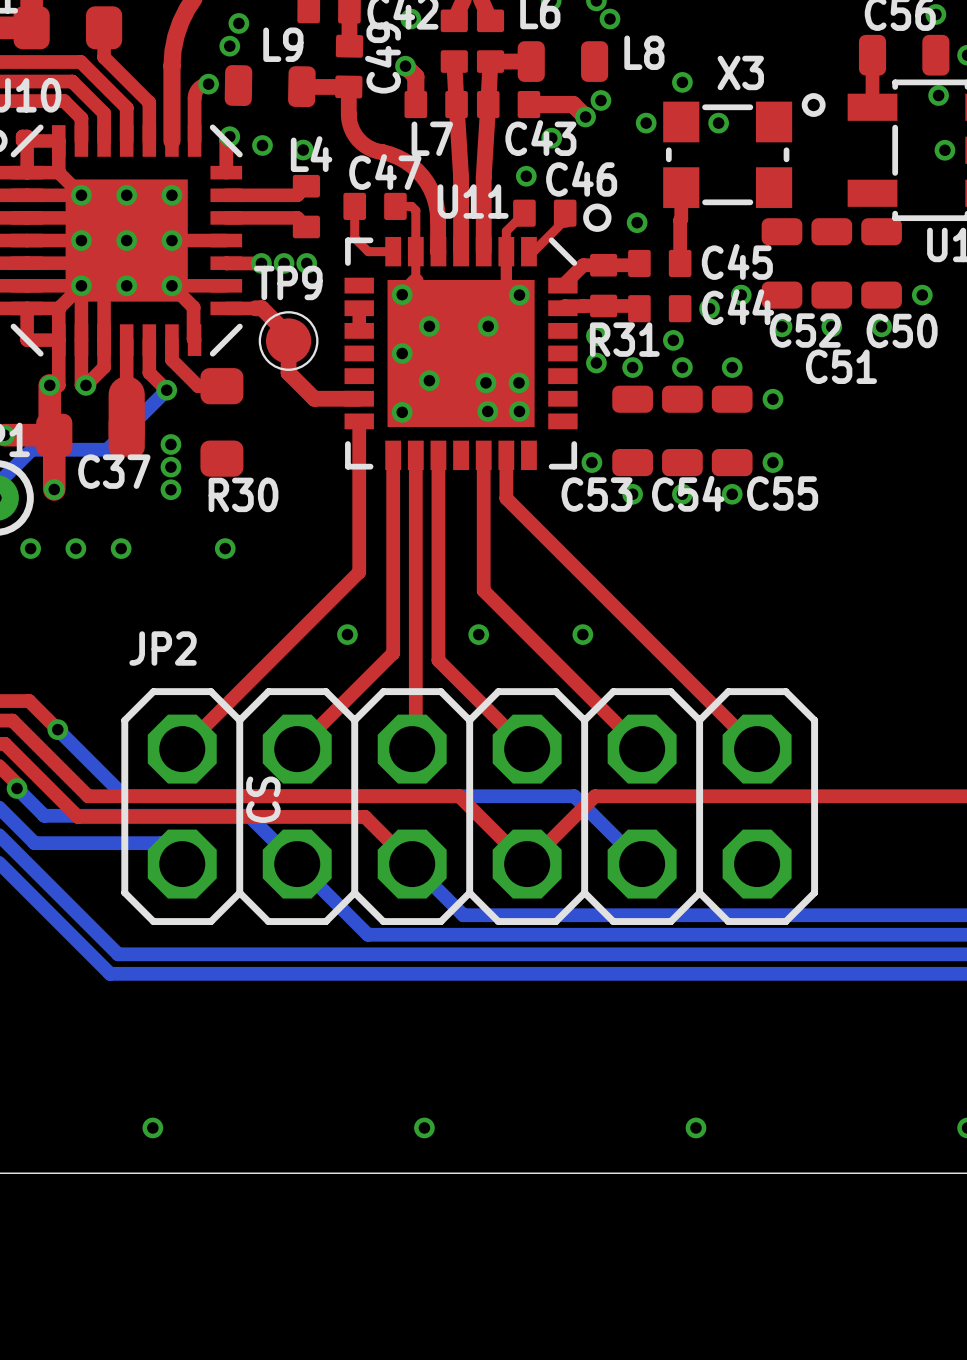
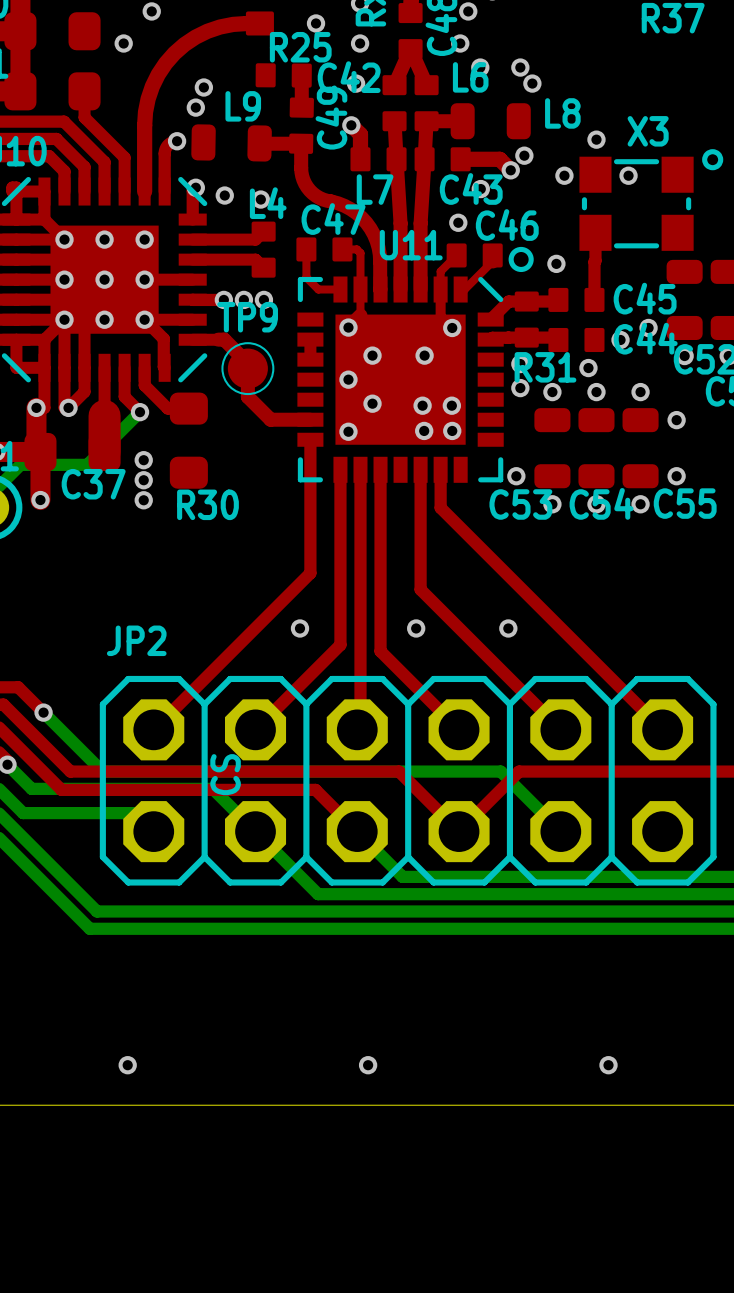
via: (30, 548) -> none
via: (75, 548) -> none
via: (121, 548) -> none
via: (225, 548) -> none

